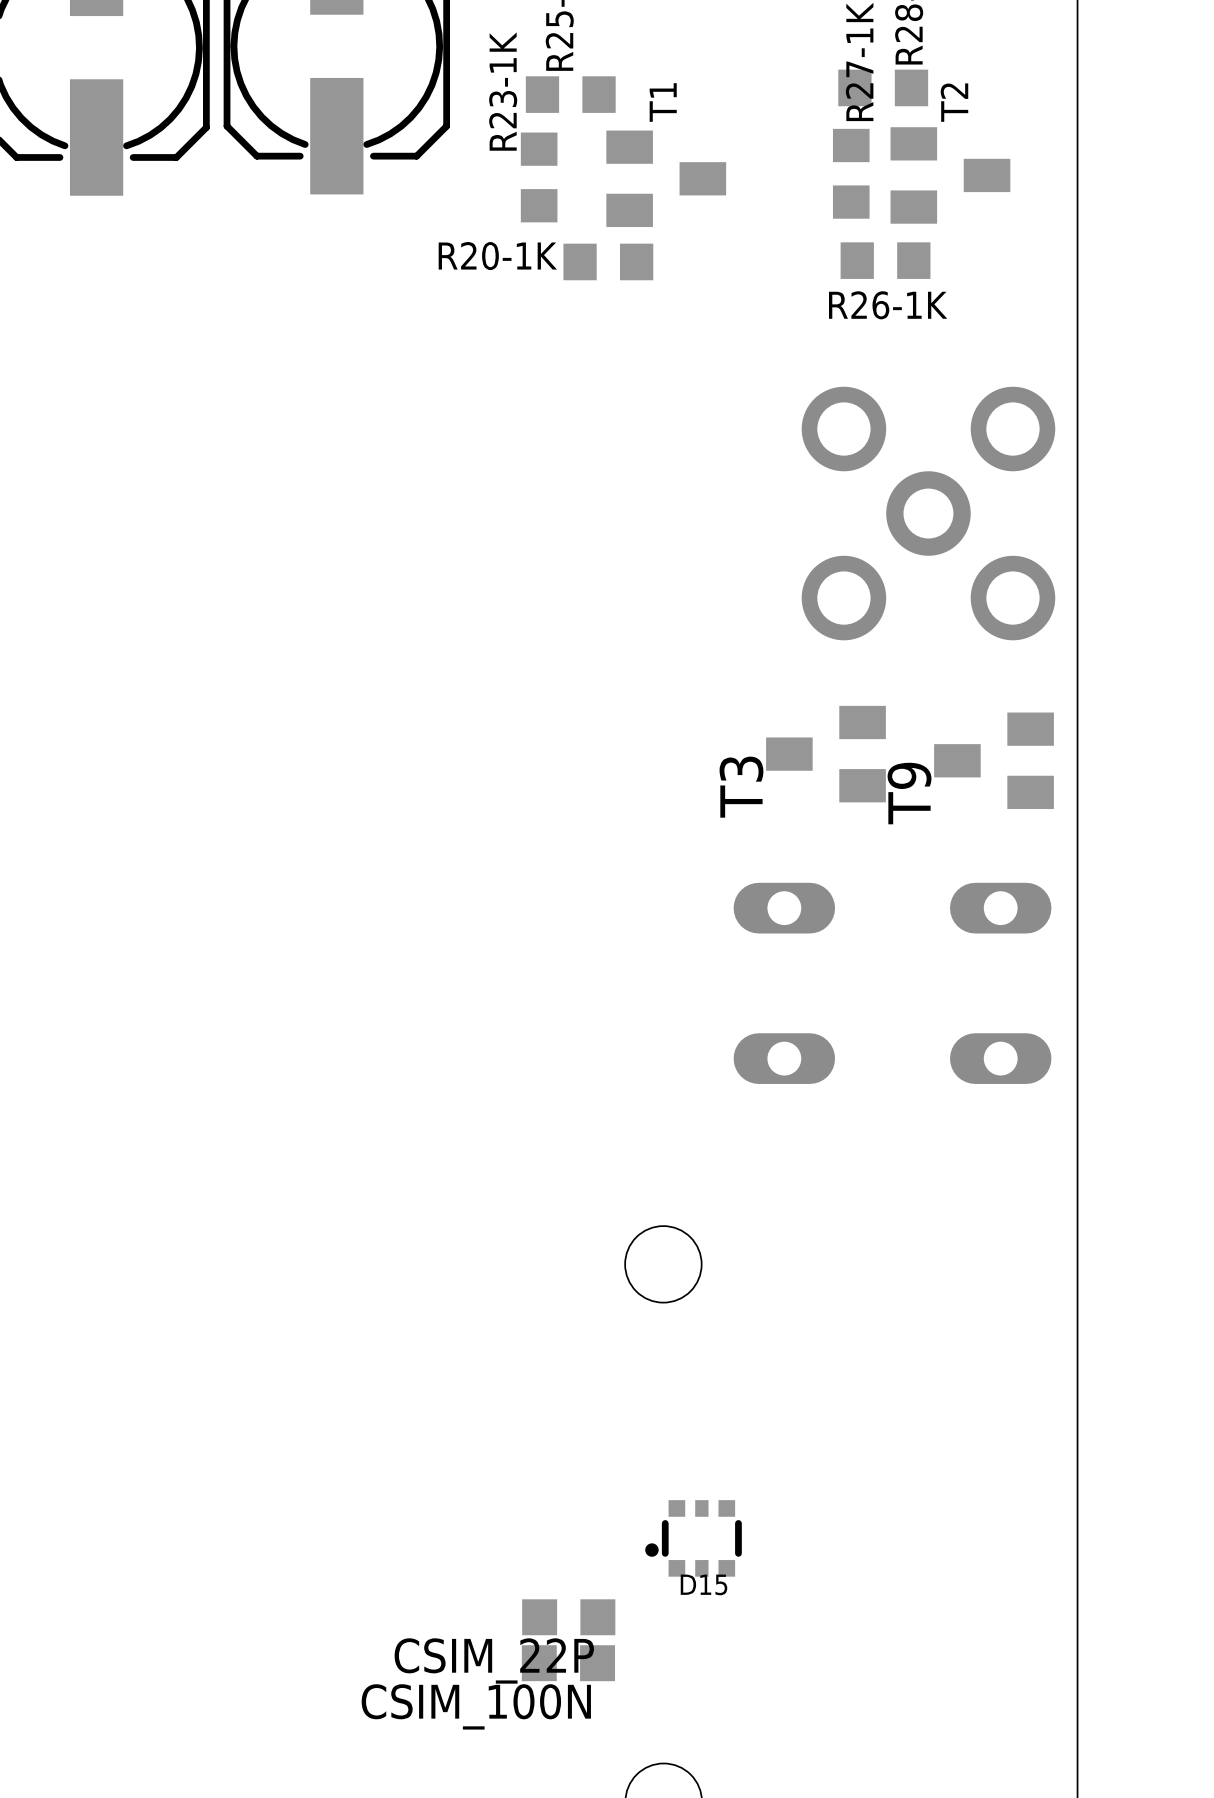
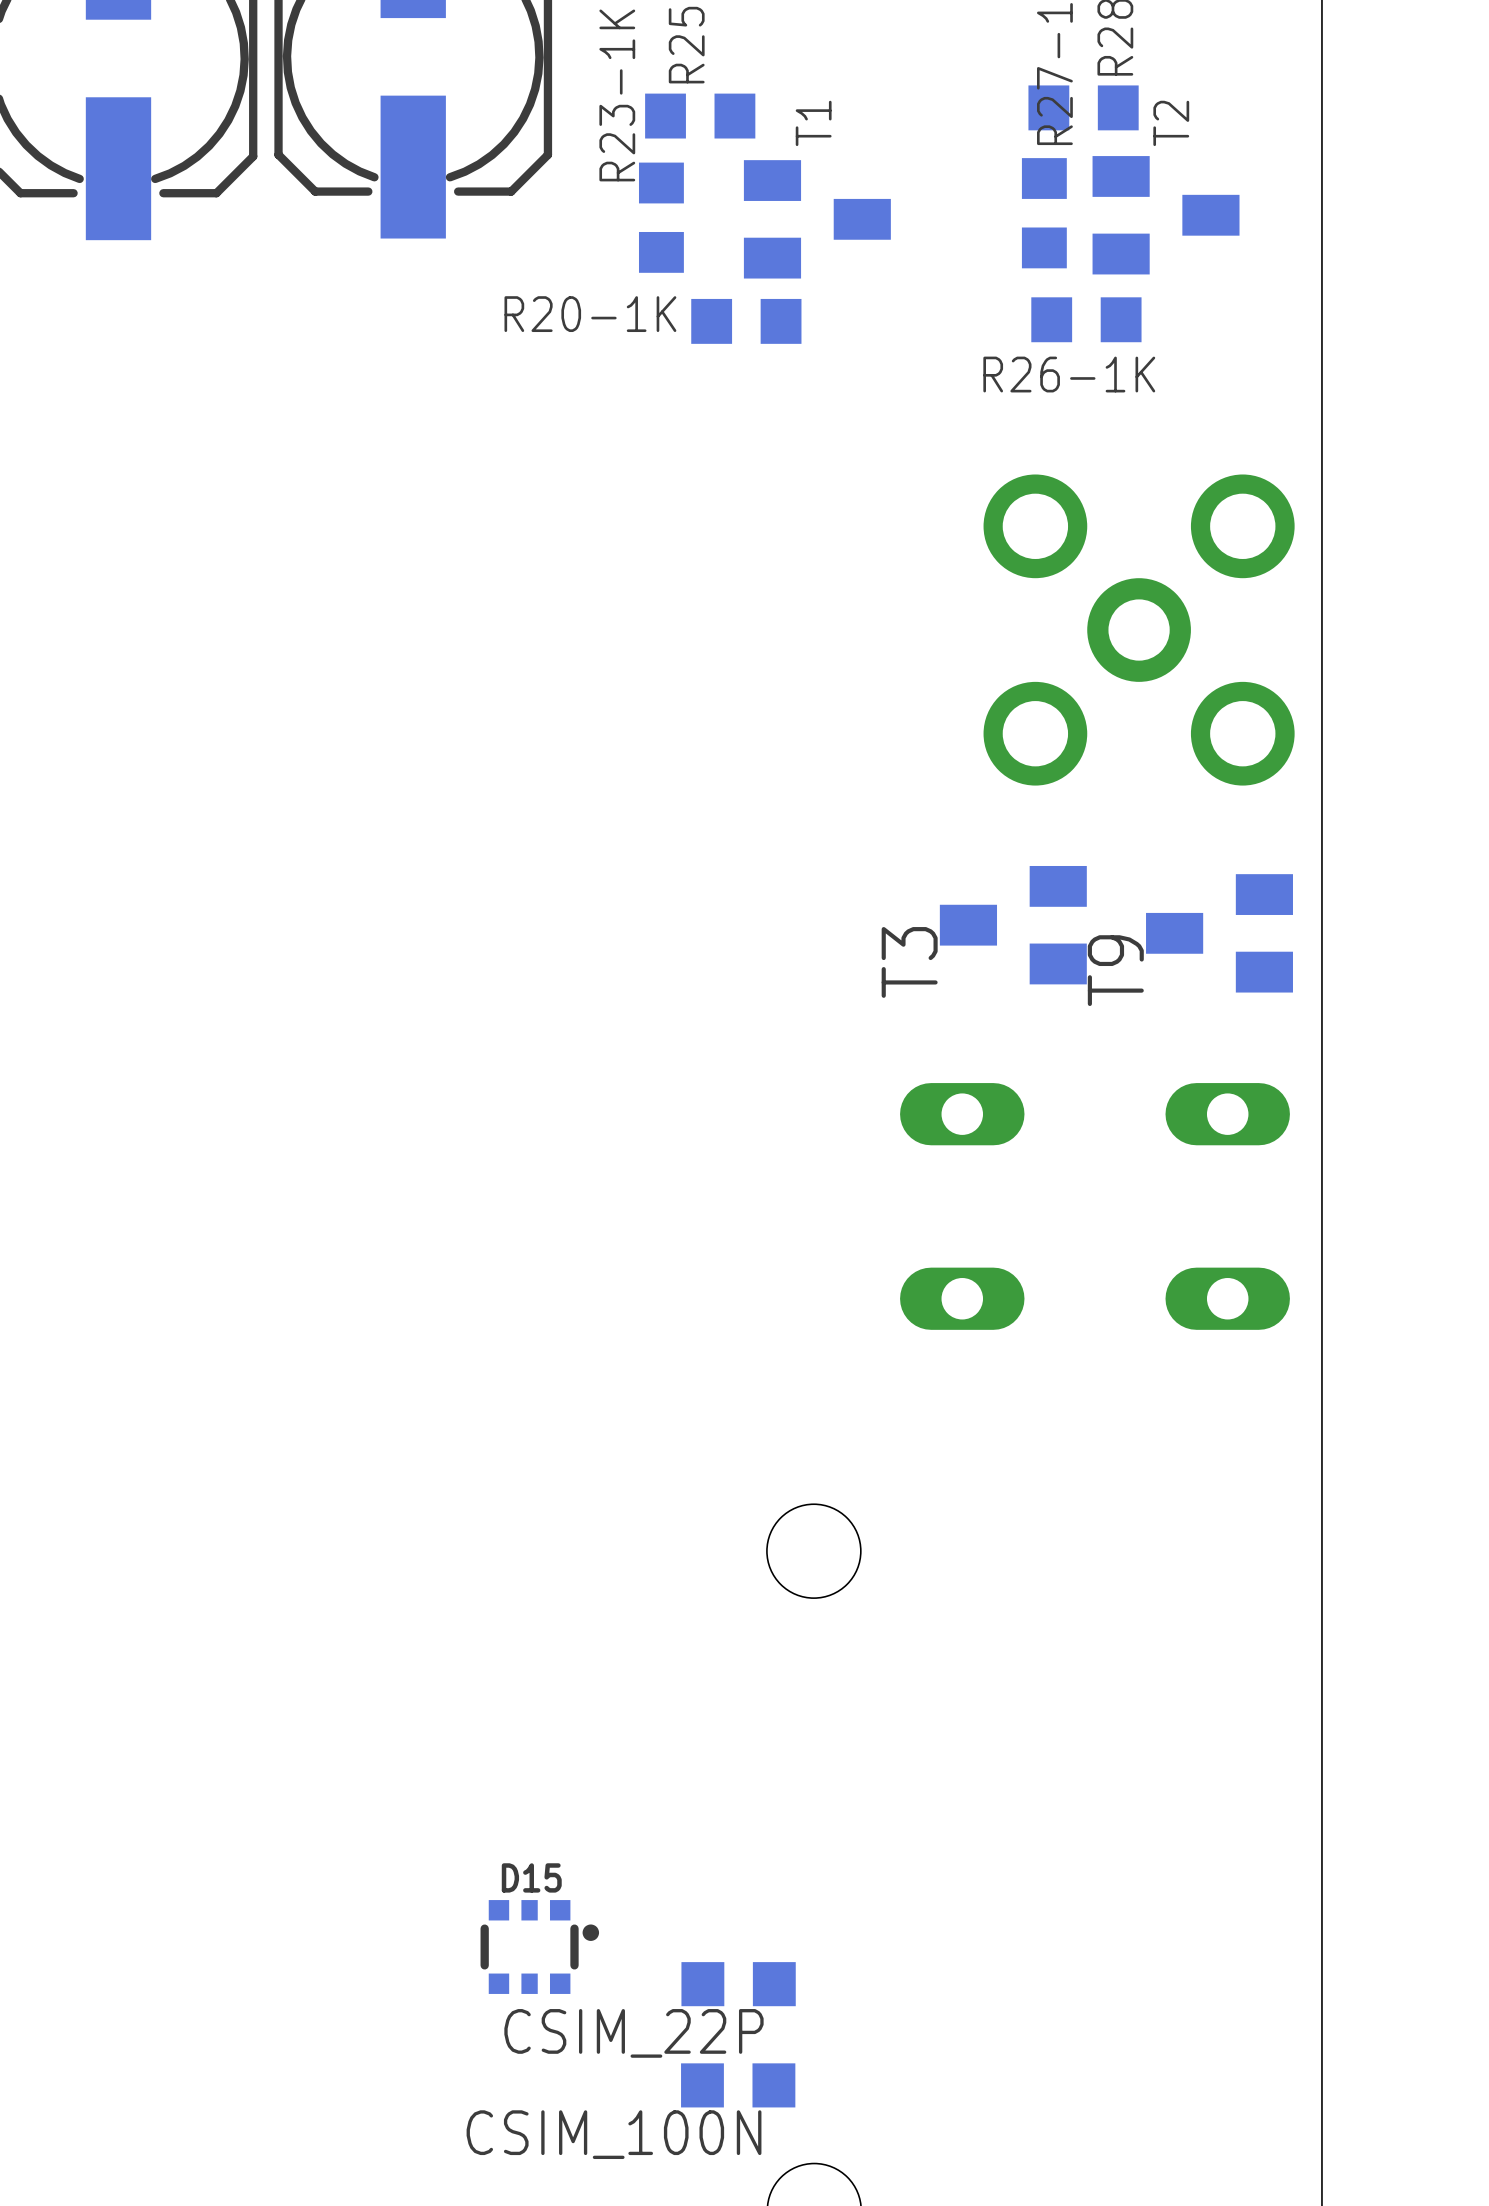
D15 rotation: 0° (693, 1538) -> 180° (539, 1947)
D15 position: (693, 1538) -> (539, 1947)
CSIM_22P position: (568, 1617) -> (738, 1984)
CSIM_100N position: (568, 1663) -> (738, 2085)

